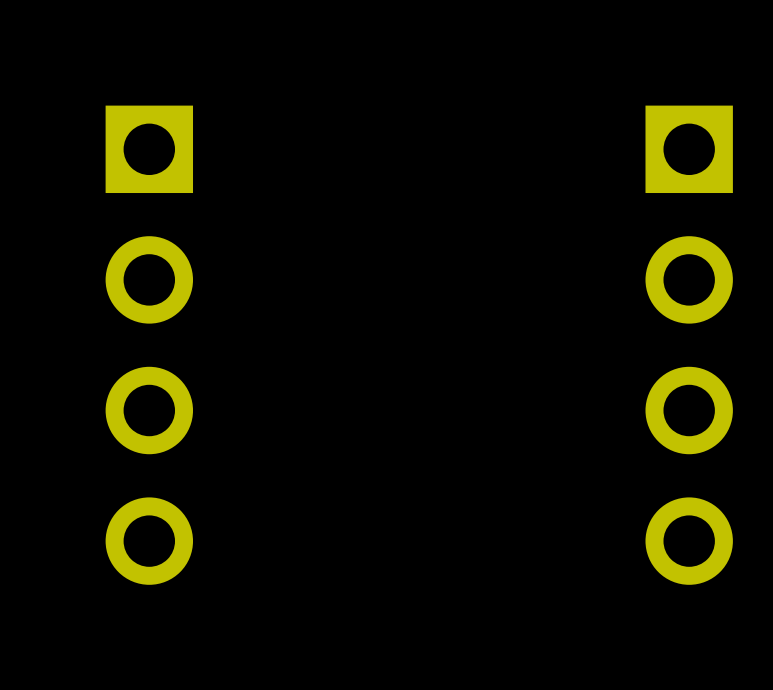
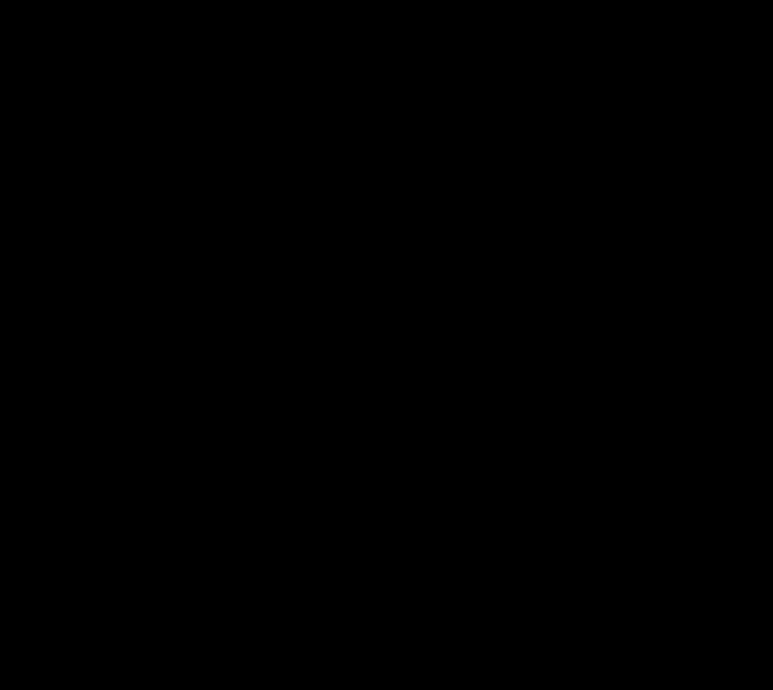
part: (149, 345) -> none
part: (689, 345) -> none

